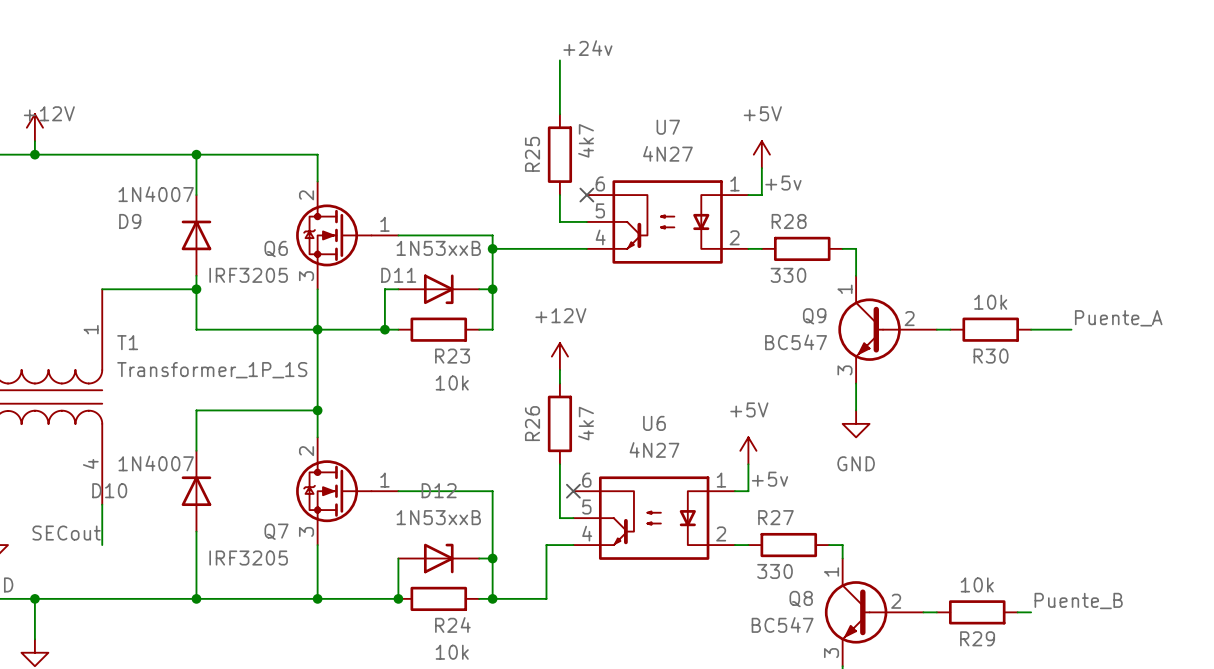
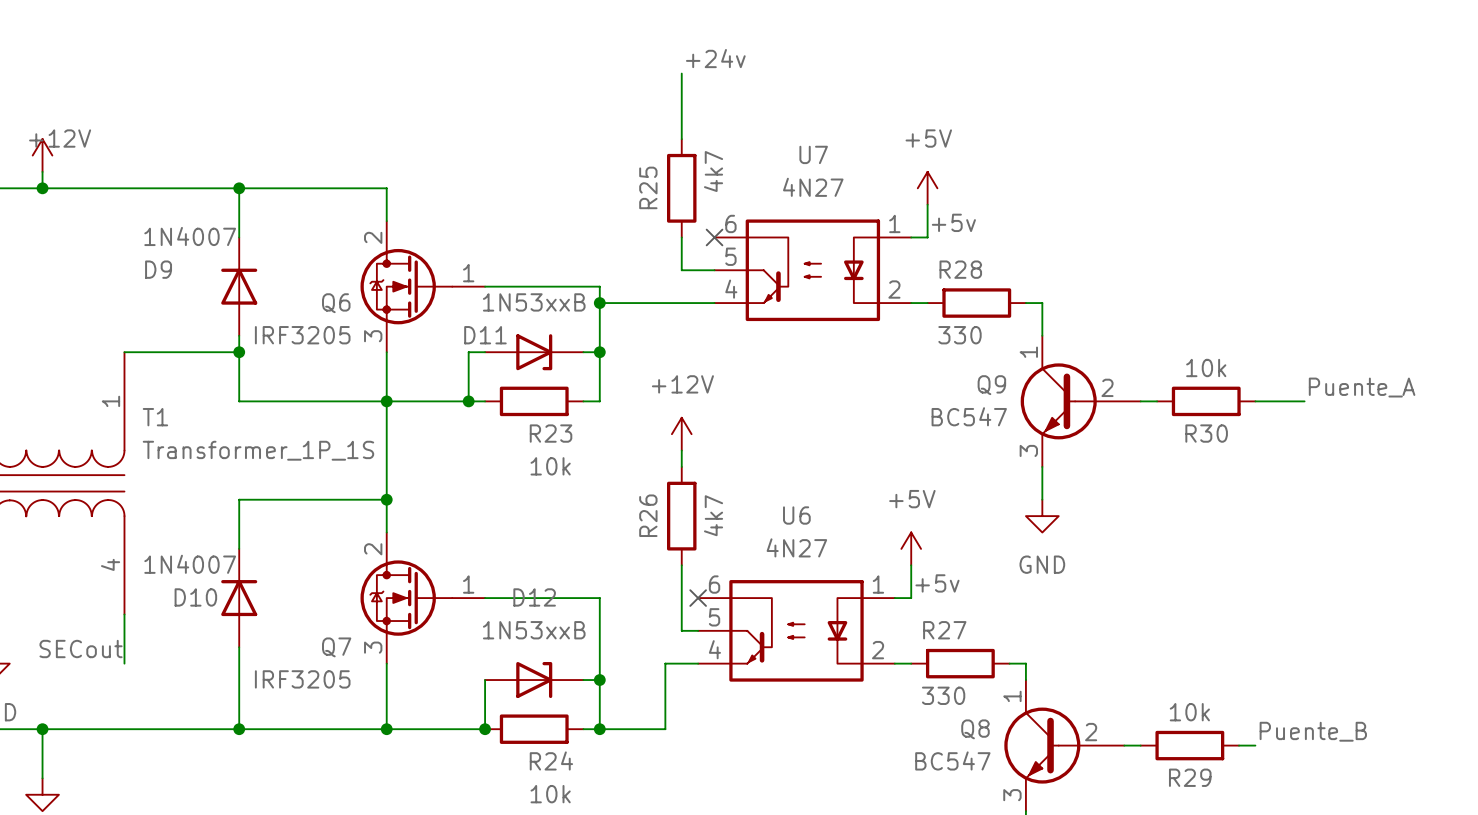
D10 name position: D10 (109, 490) -> D10 (195, 597)

